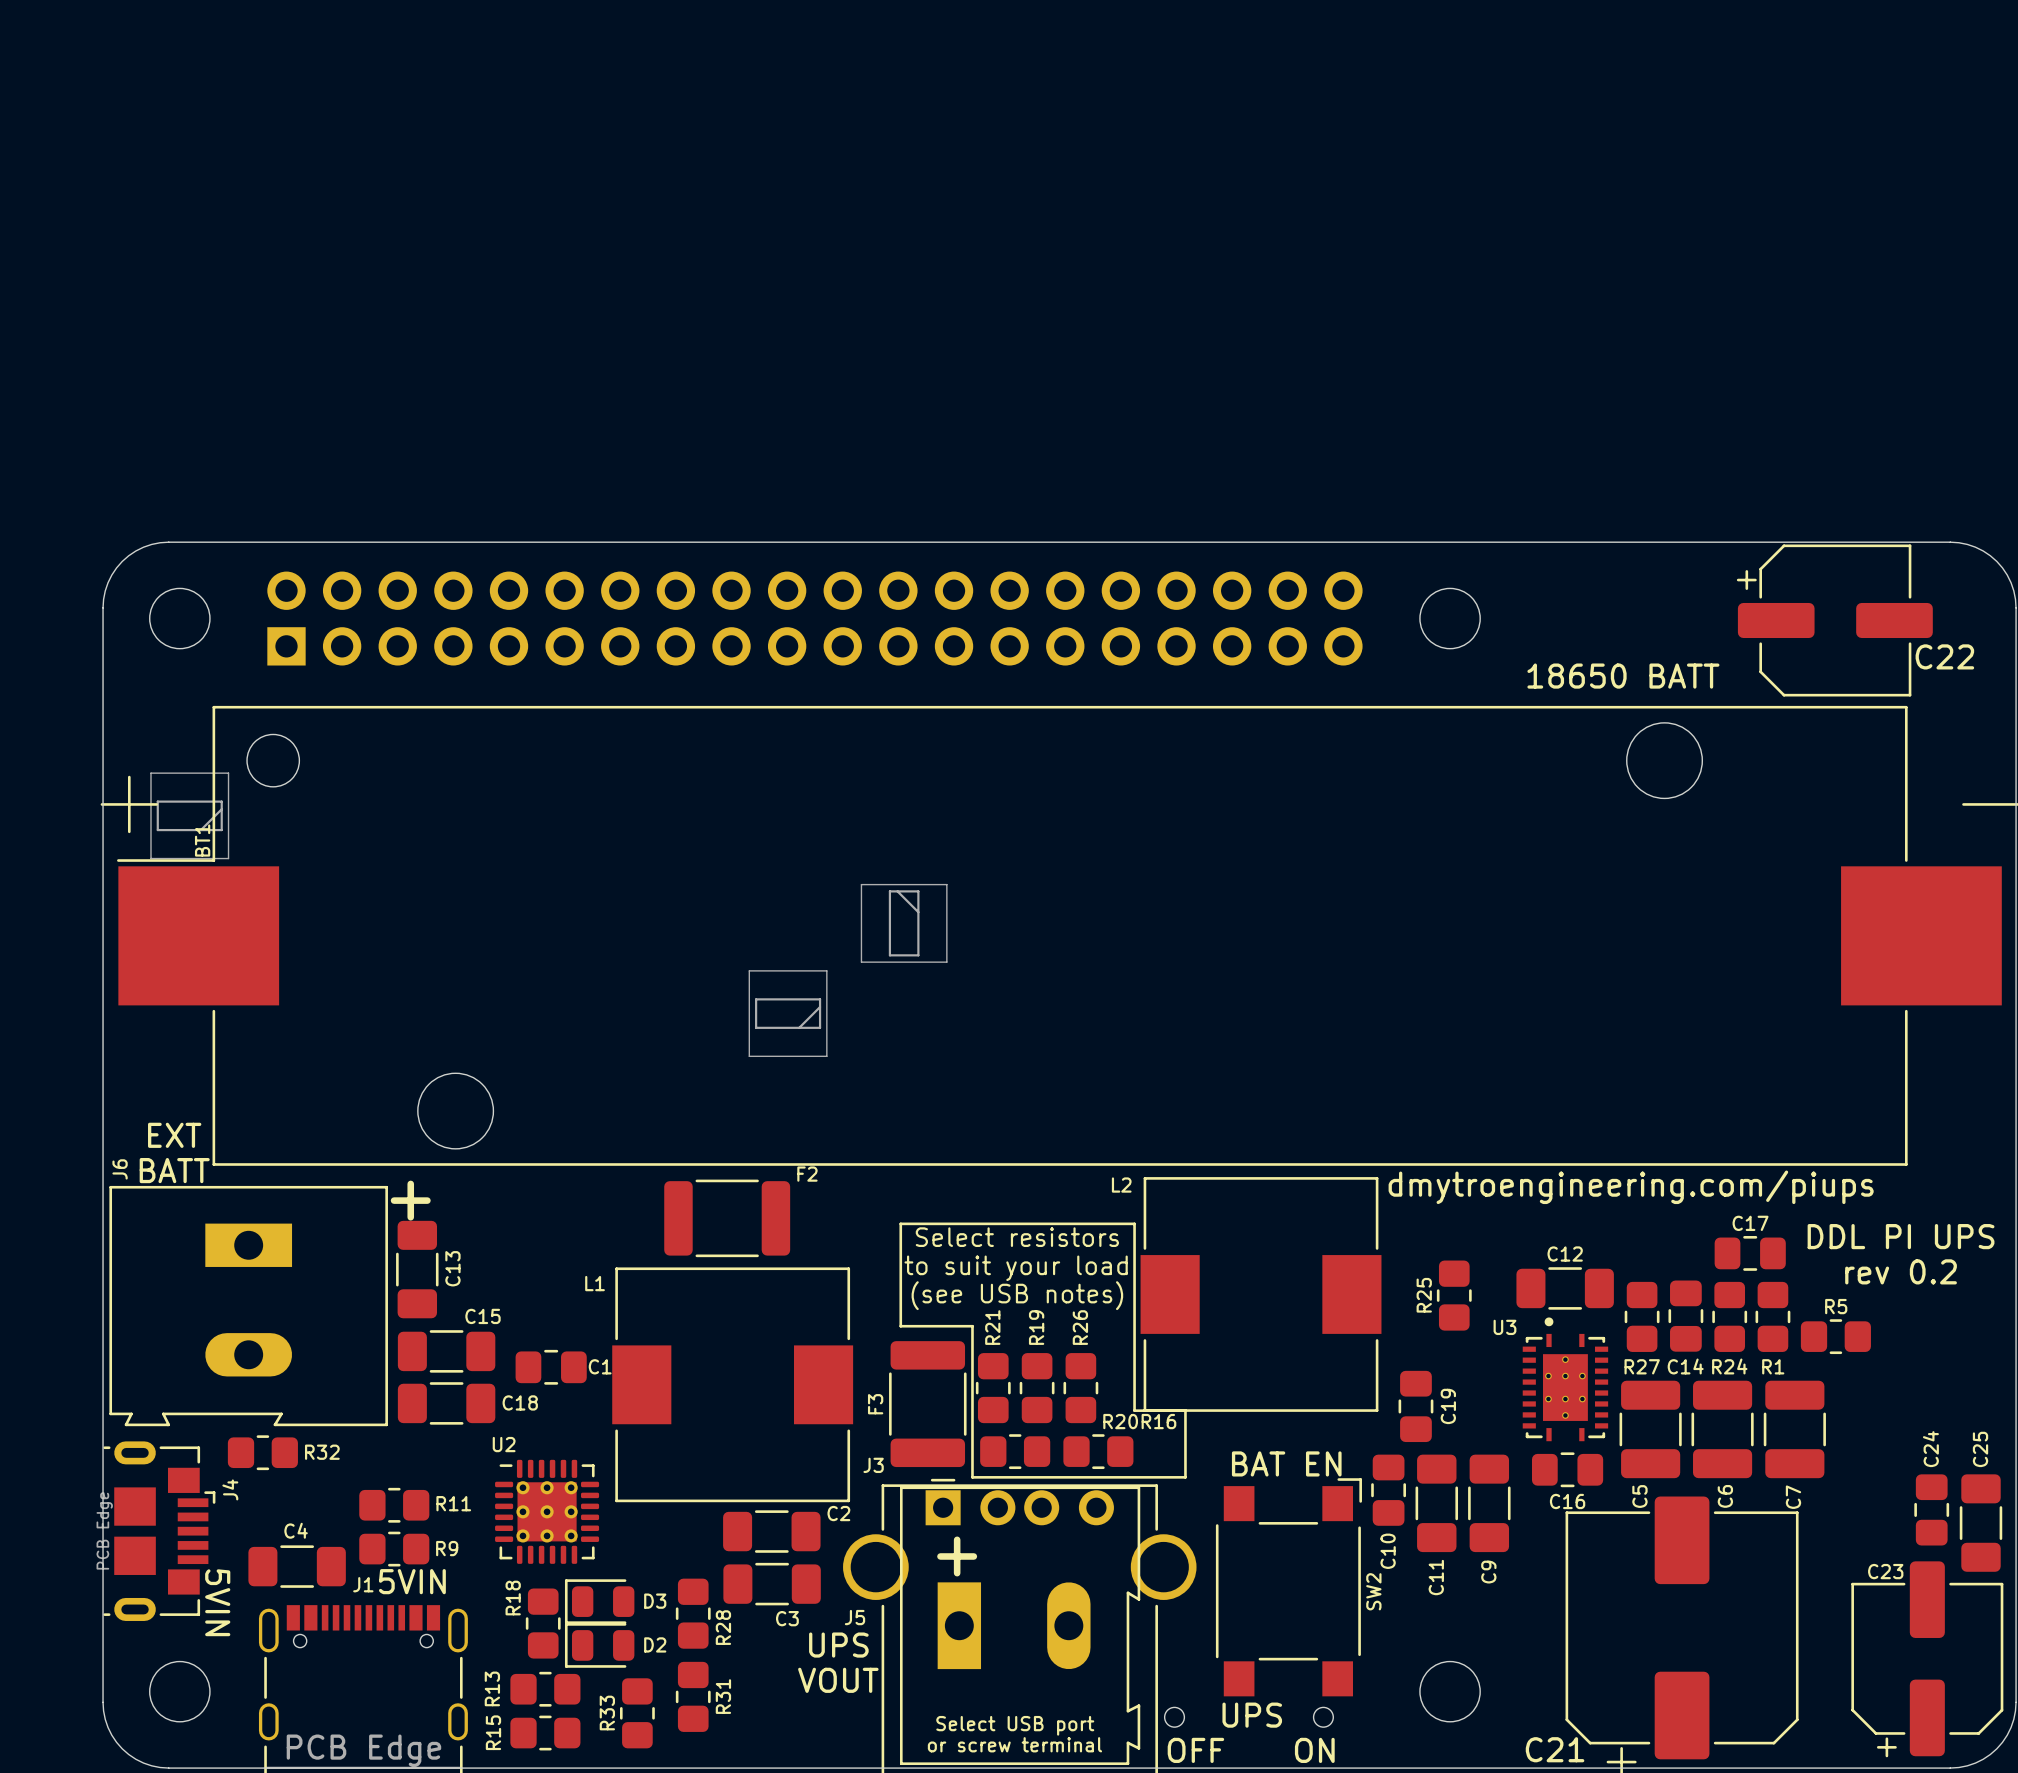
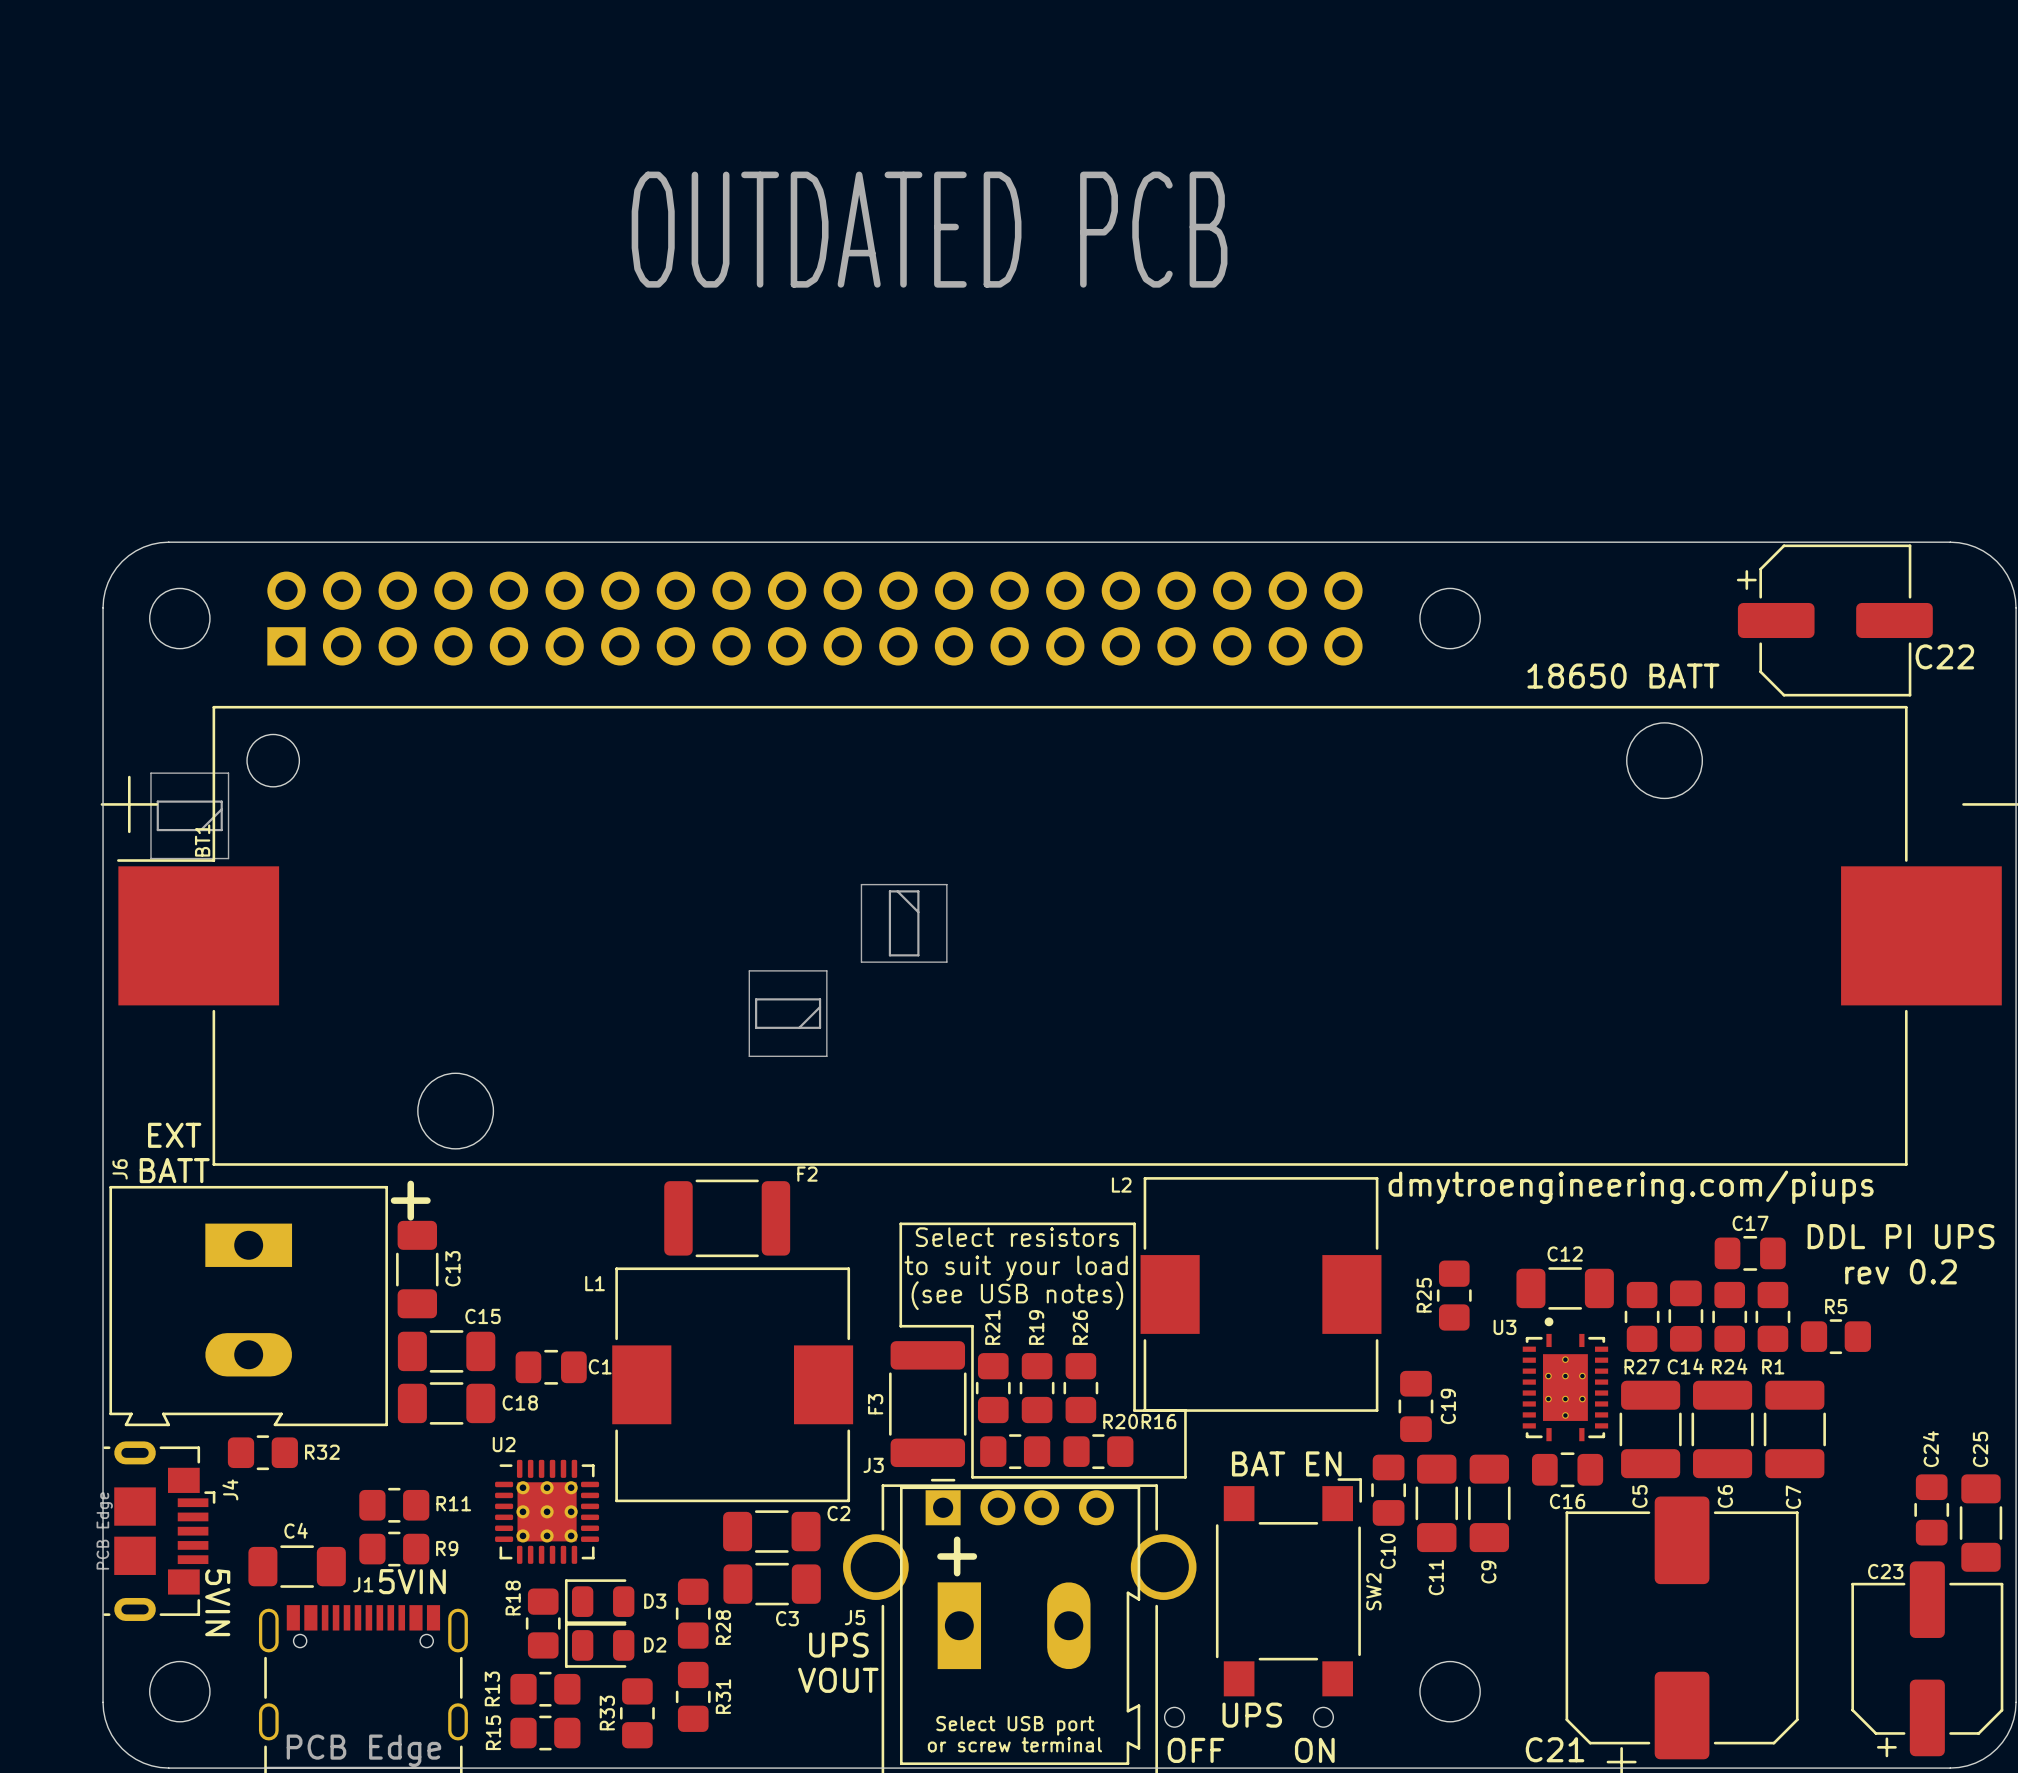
text: none -> OUTDATED PCB (929, 229)

